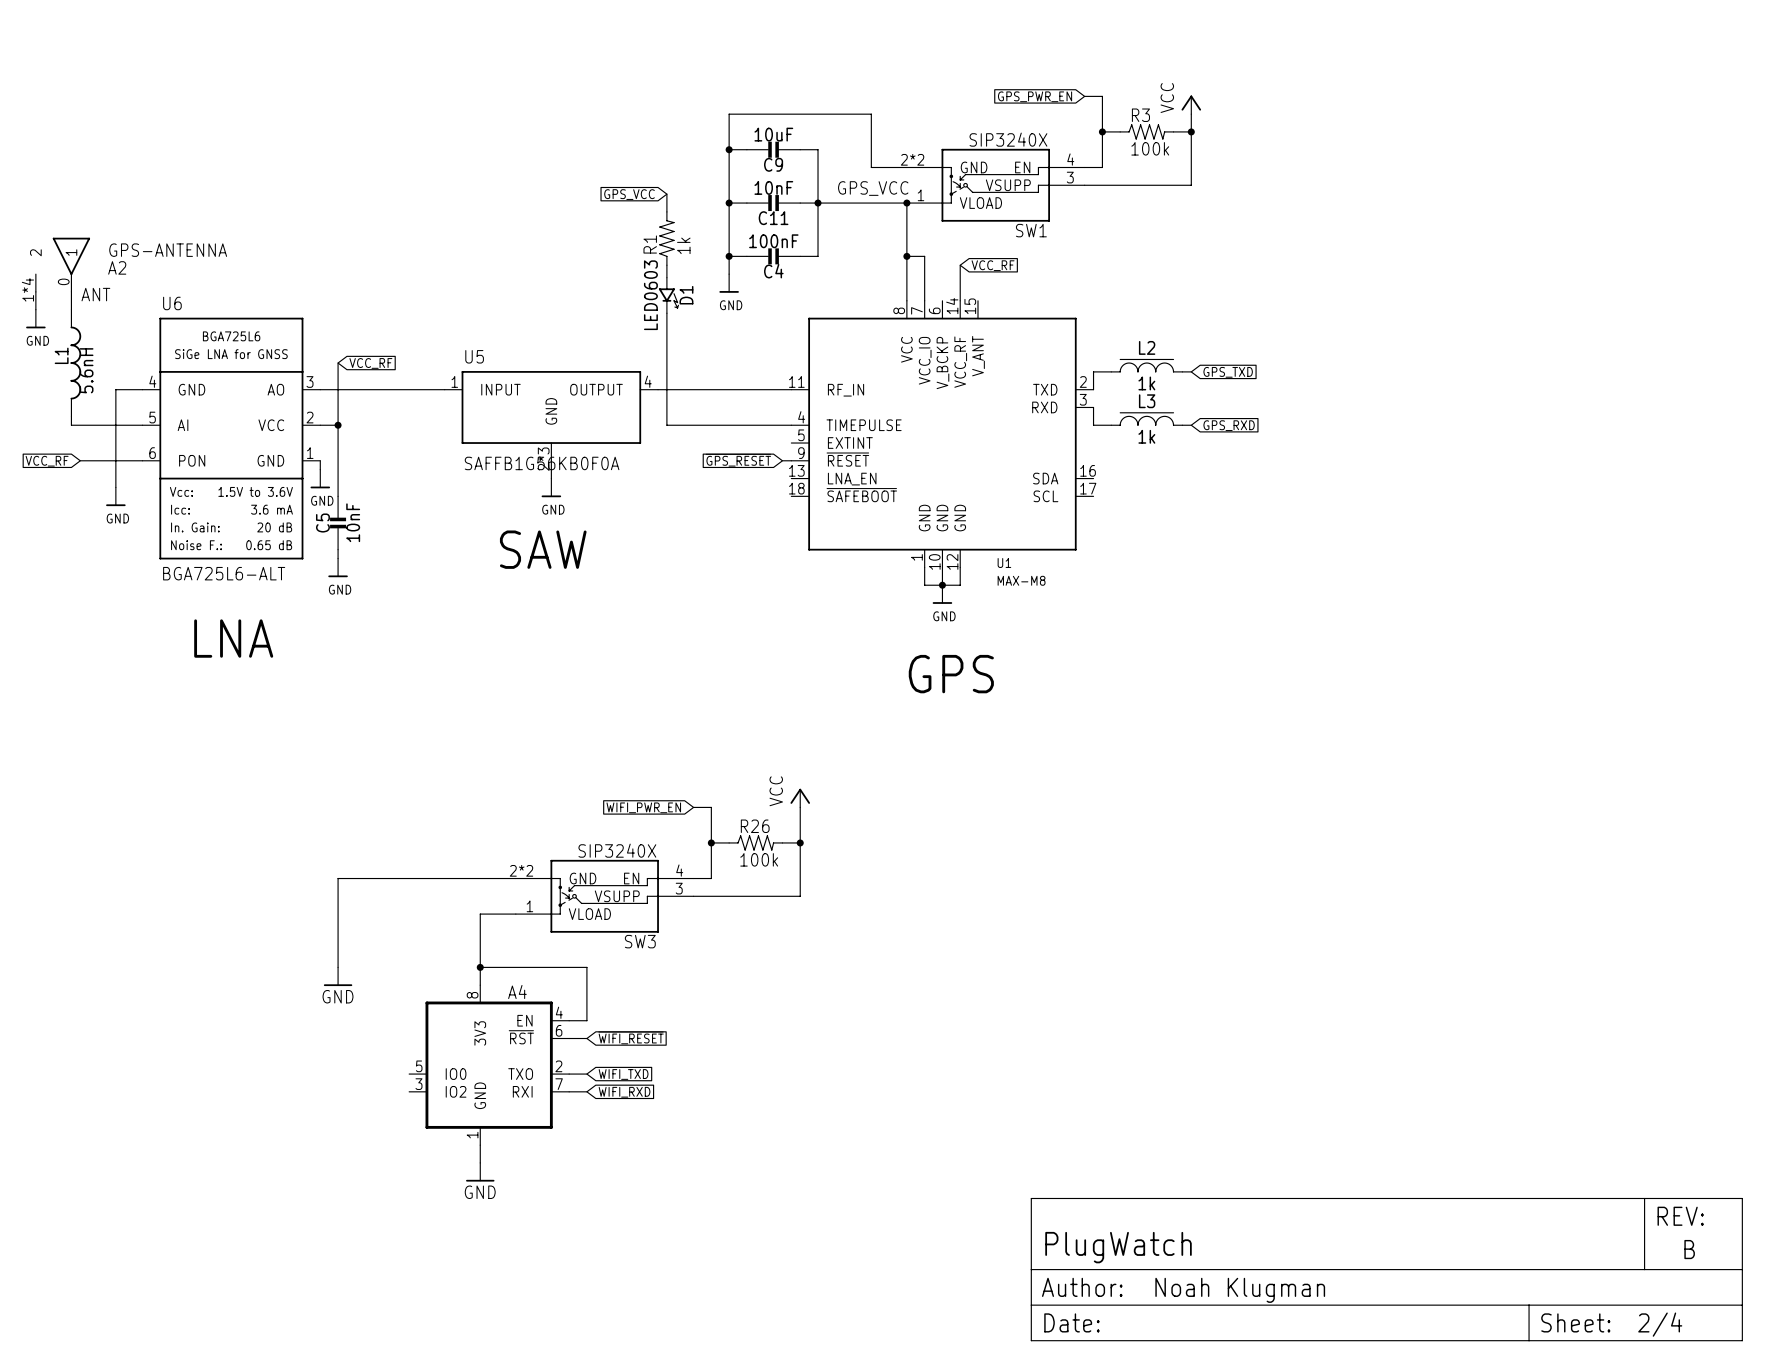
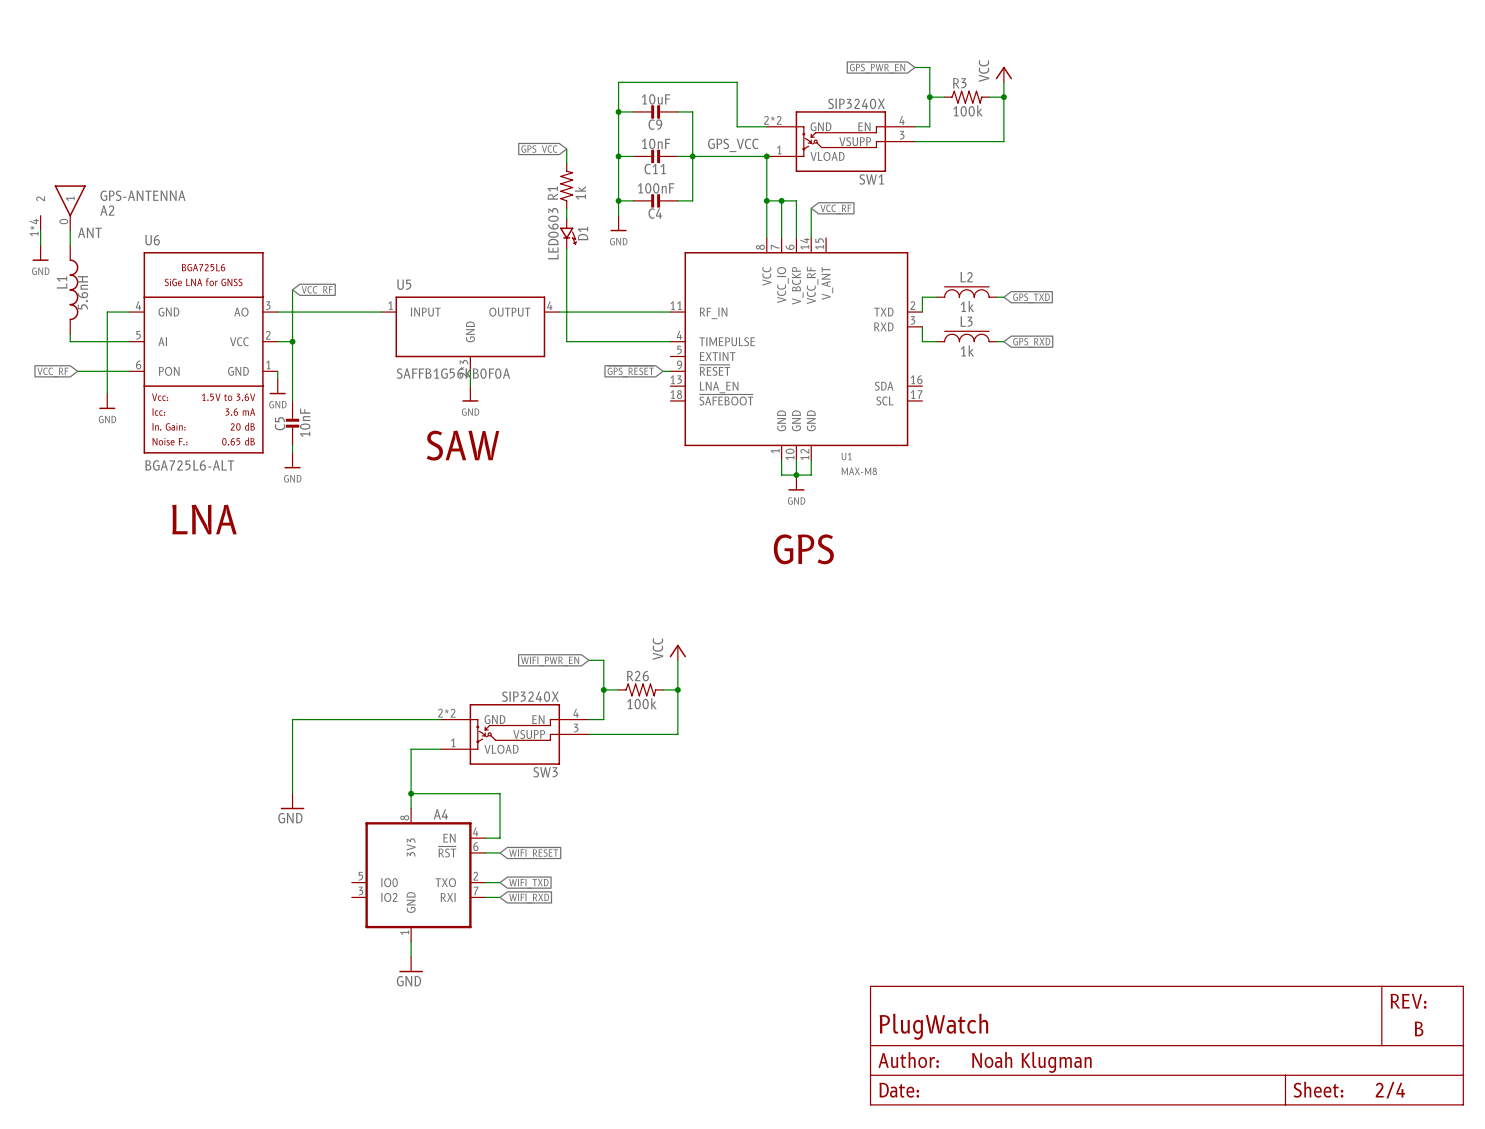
wire: none -> (781, 200) (796, 200) (796, 237)
junction: none -> (781, 200)

